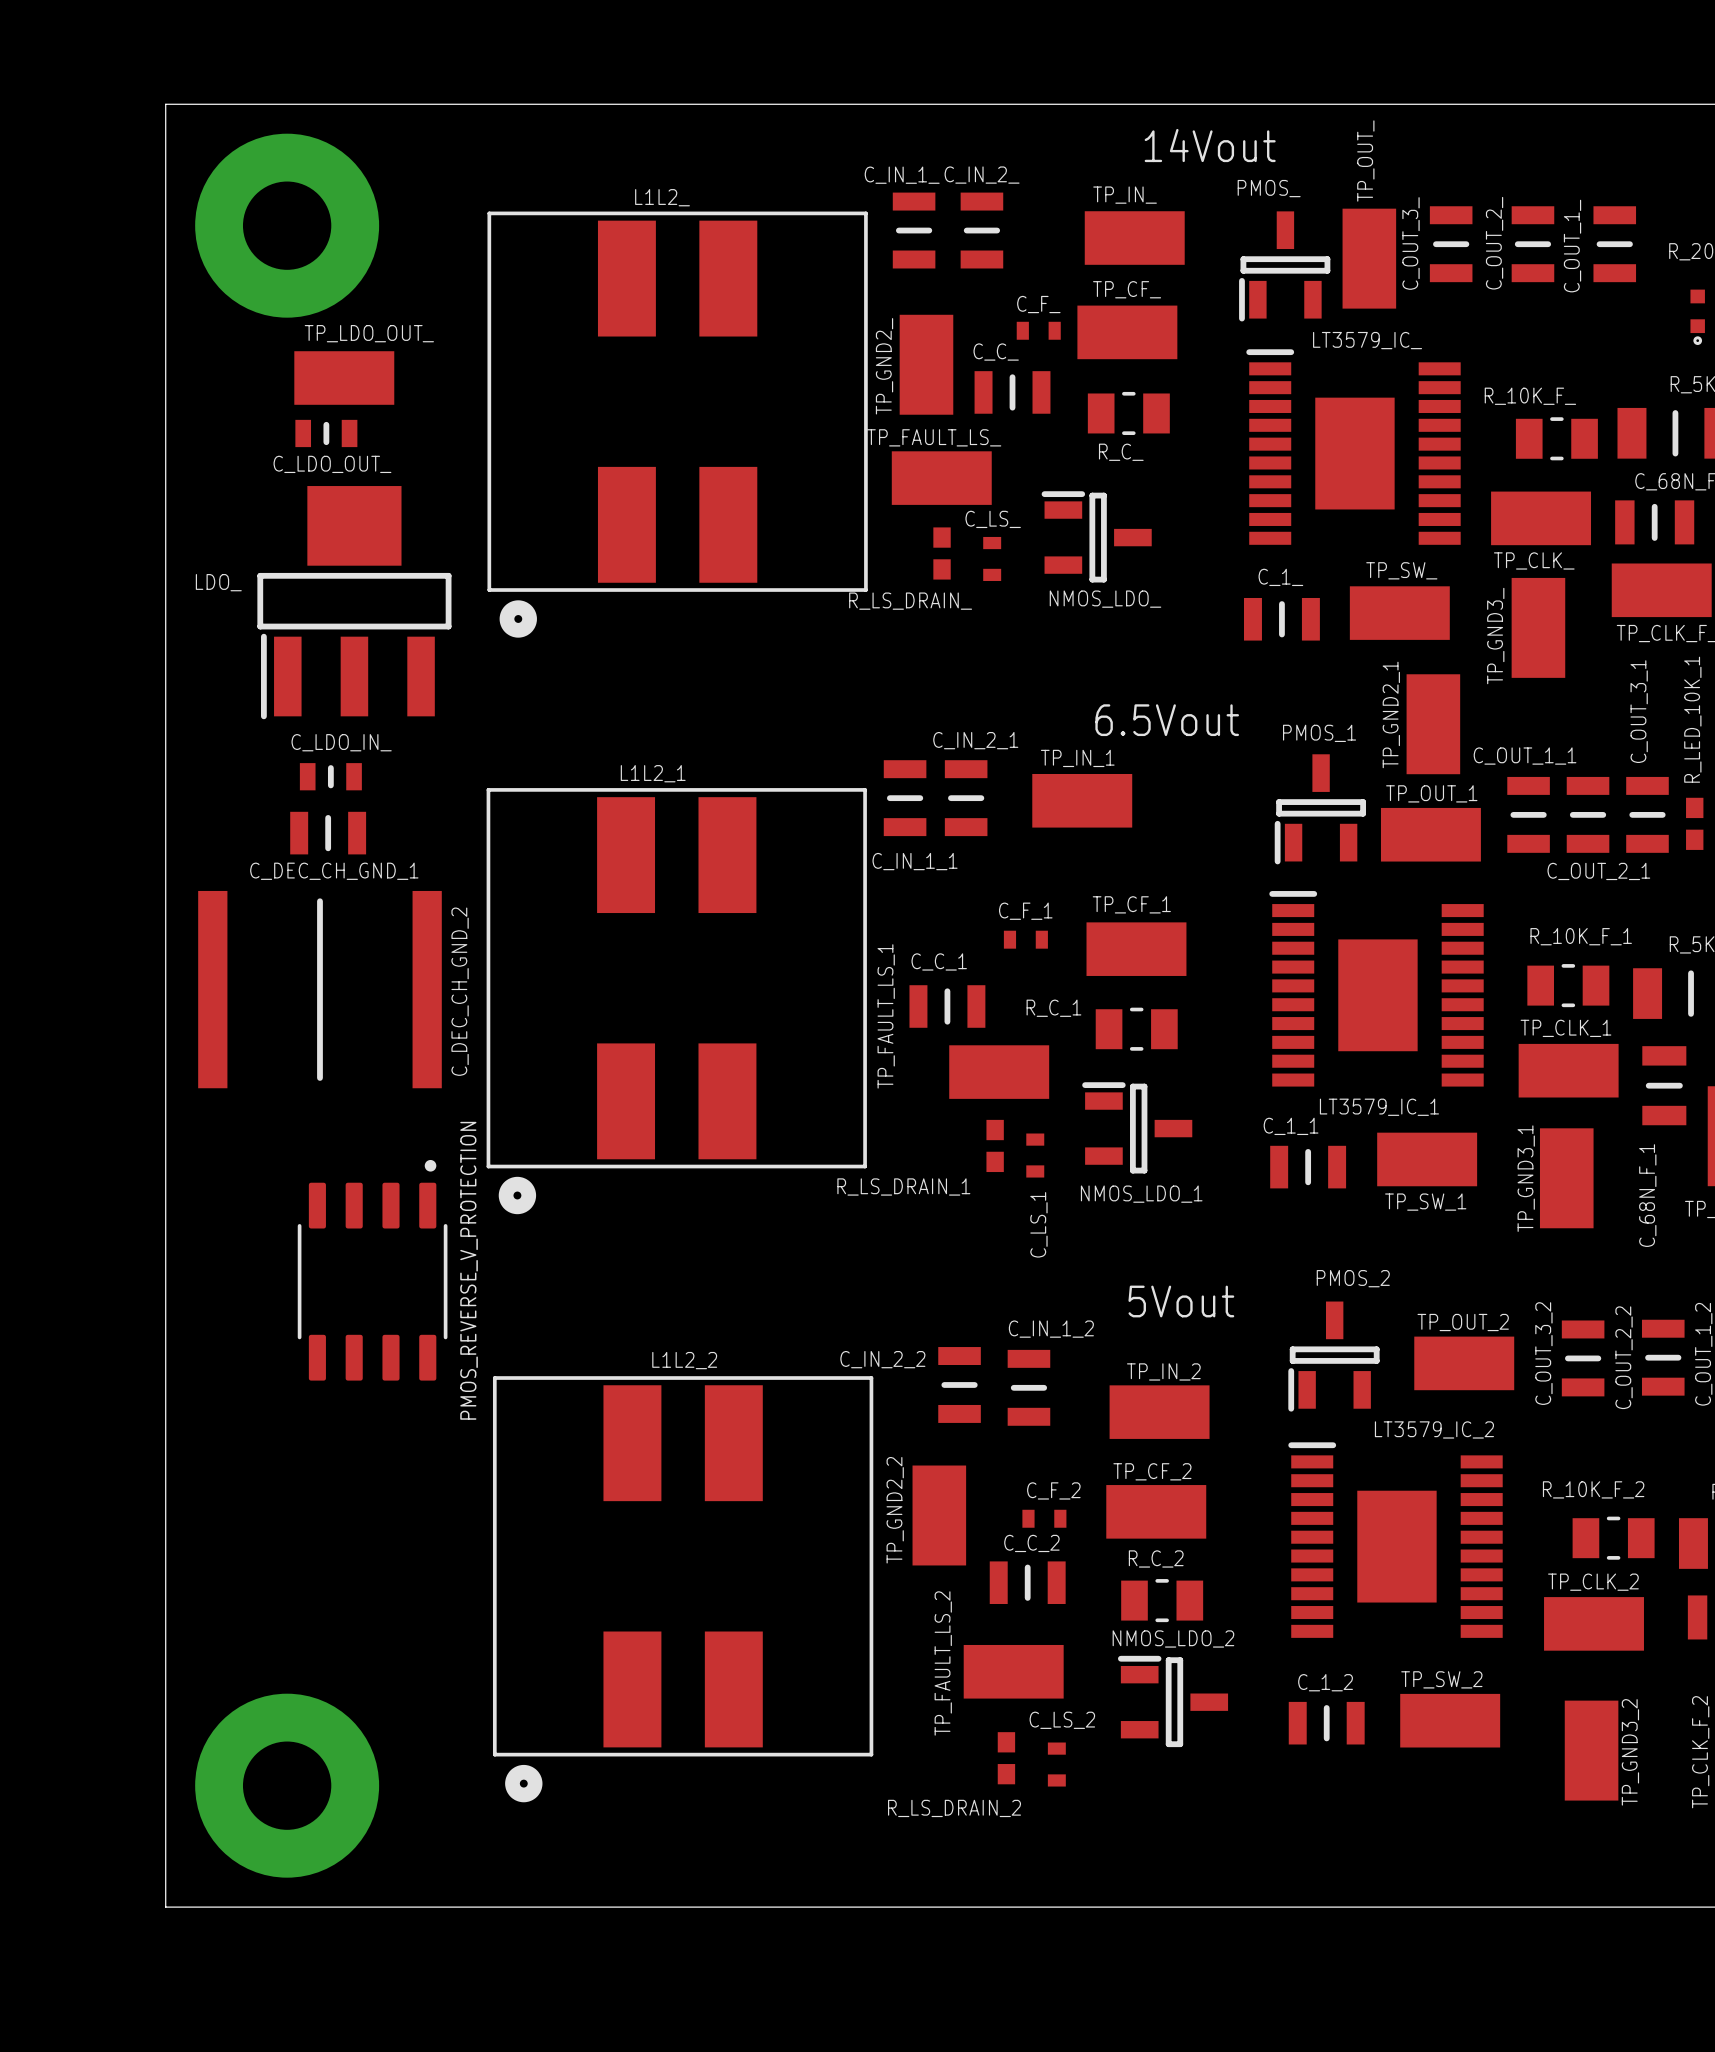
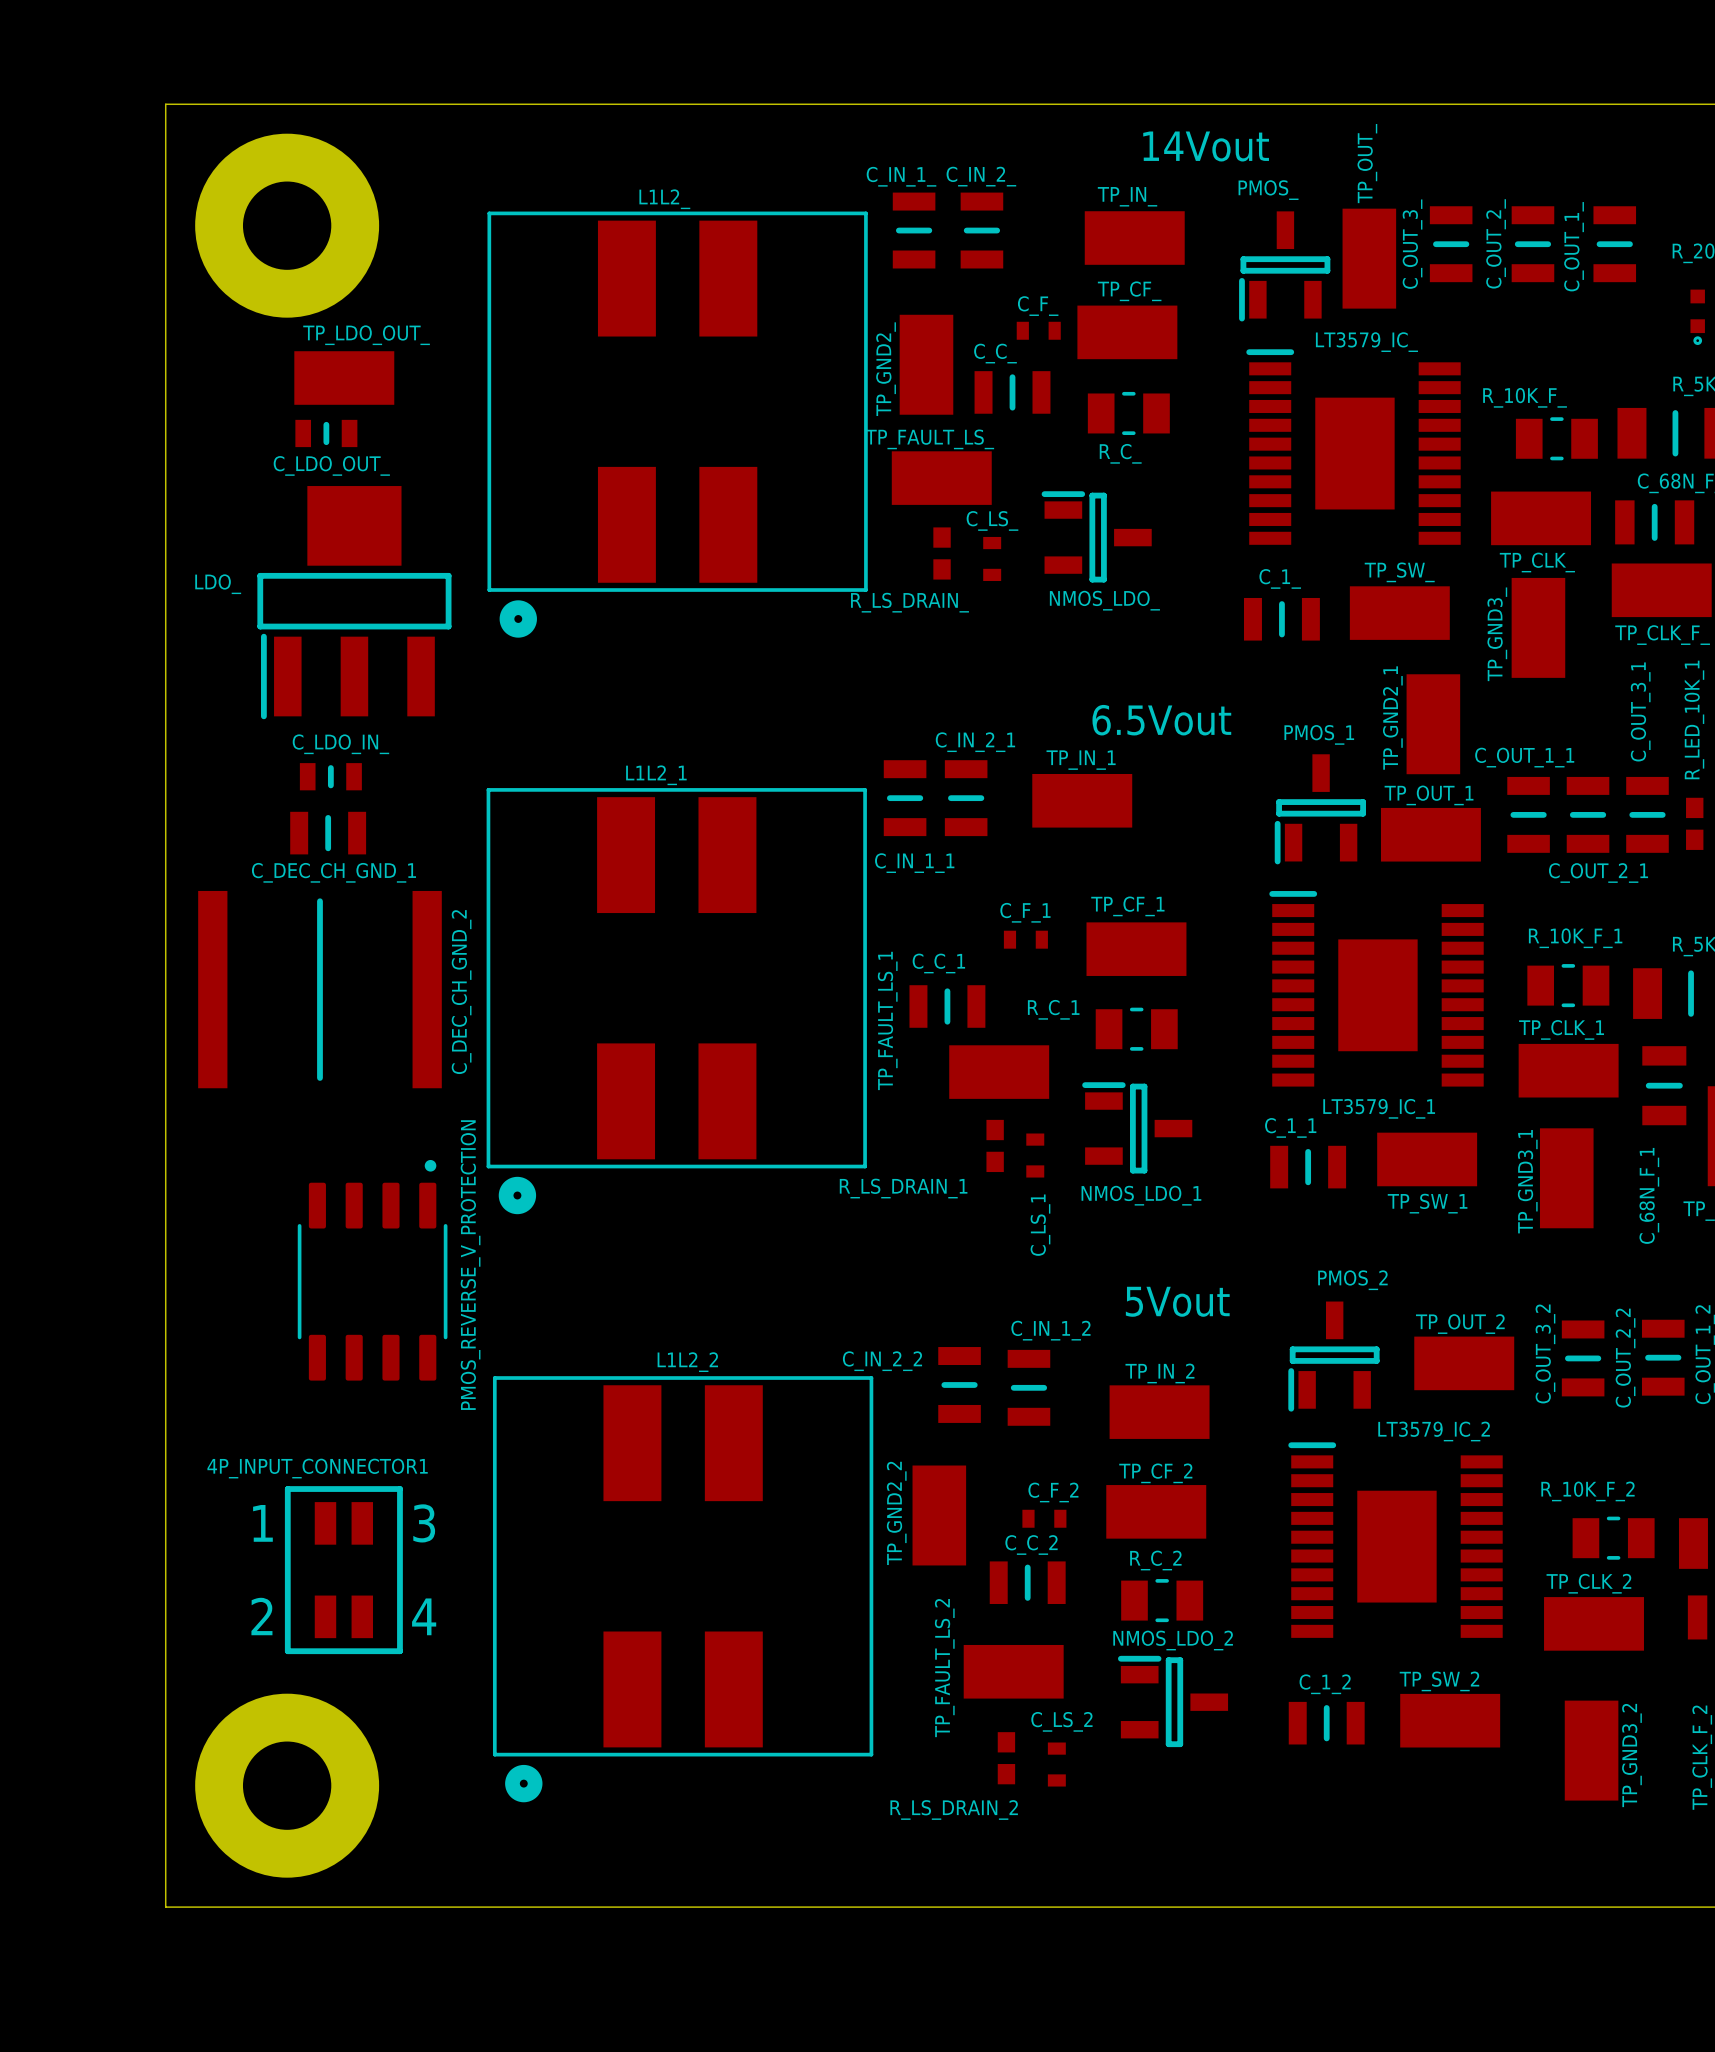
4P_INPUT_CONNECTOR1: none -> (343, 1570)

